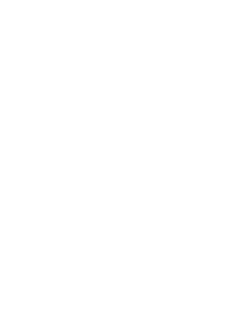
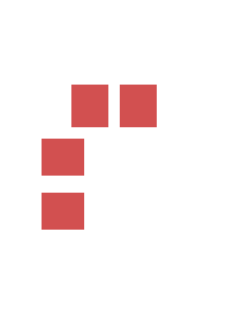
part: none -> (114, 105)
part: none -> (62, 184)

